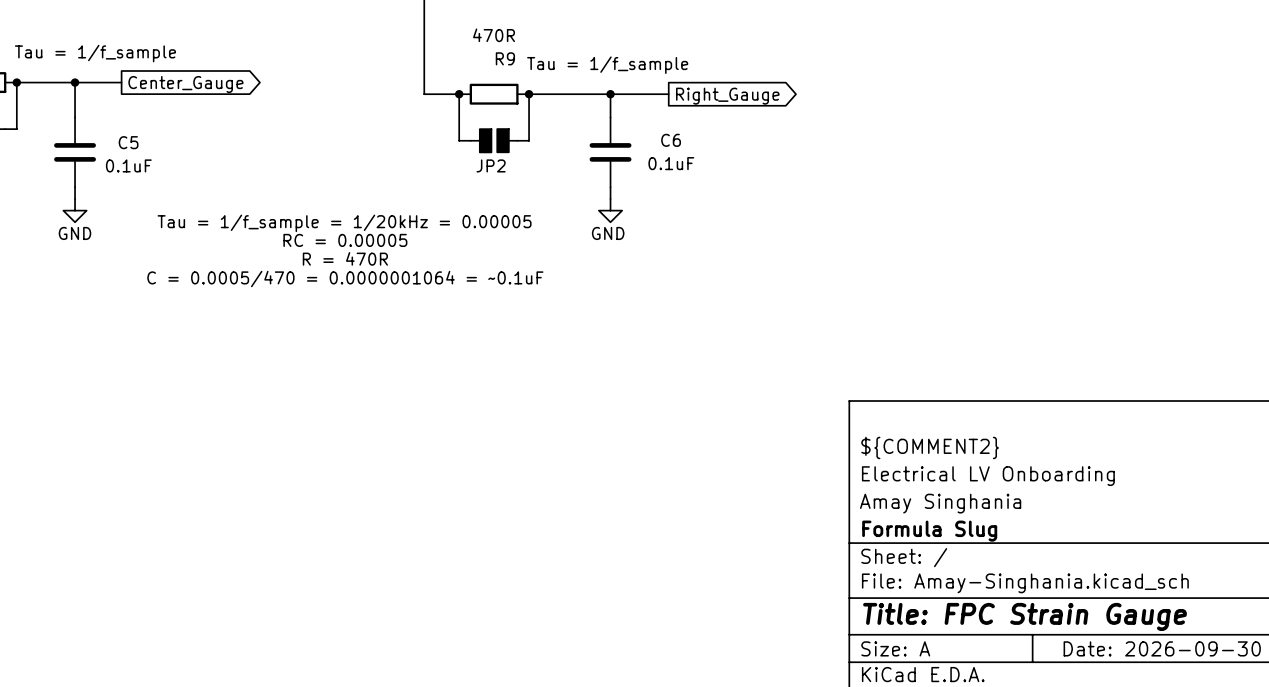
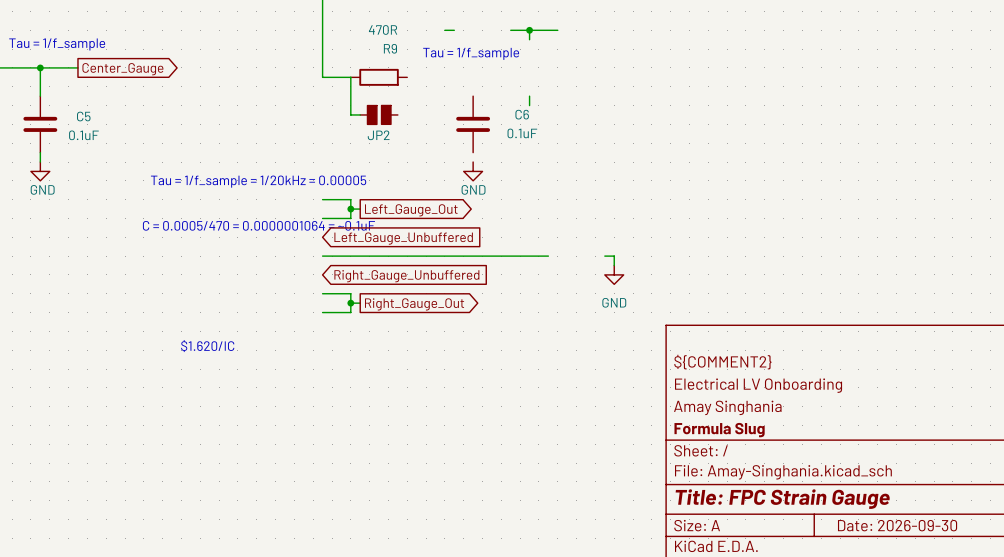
wire: none -> (444, 30) (454, 30)
wire: none -> (510, 30) (557, 30)
wire: none -> (529, 30) (529, 39)
junction: none -> (529, 30)
junction: (459, 94) -> none
junction: (529, 94) -> none
wire: (610, 94) (610, 117) -> none
junction: (610, 94) -> none
wire: (668, 94) (529, 94) (529, 140) (517, 140) -> none
global label: Right_Gauge (727, 96) -> none
wire: (610, 187) (610, 198) -> (529, 96) (529, 105)
text: RC = 0.00005 (345, 240) -> none
wire: none -> (322, 199) (350, 199) (350, 218) (322, 218)
wire: none -> (350, 209) (360, 209)
junction: none -> (350, 209)
text: R = 470R (345, 258) -> none
global label: none -> Left_Gauge_Out (411, 210)
global label: none -> Left_Gauge_Unbuffered (403, 238)
wire: none -> (322, 256) (548, 256)
wire: none -> (604, 256) (614, 256) (614, 265)
power symbol: none -> GND (614, 274)
global label: none -> Right_Gauge_Unbuffered (406, 276)
wire: none -> (322, 293) (350, 293) (350, 312) (322, 312)
wire: none -> (350, 303) (360, 303)
junction: none -> (350, 303)
global label: none -> Right_Gauge_Out (414, 304)
text: none -> $1.620/IC (207, 346)

